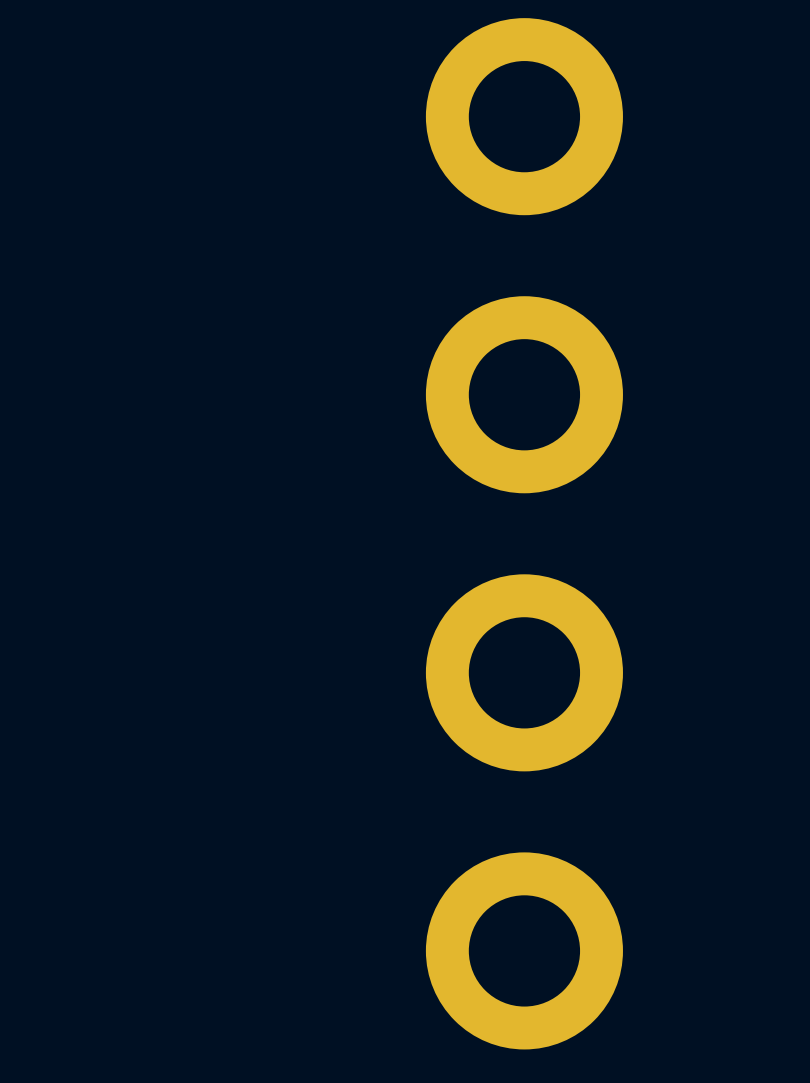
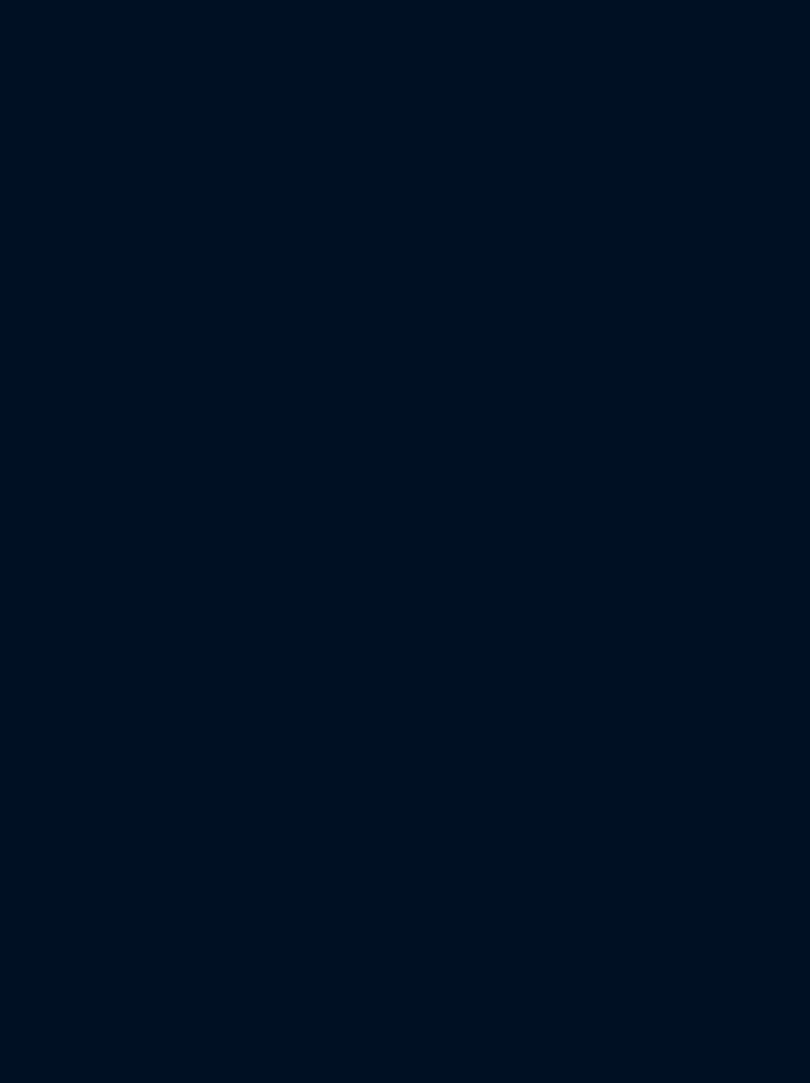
part: (524, 533) -> none

